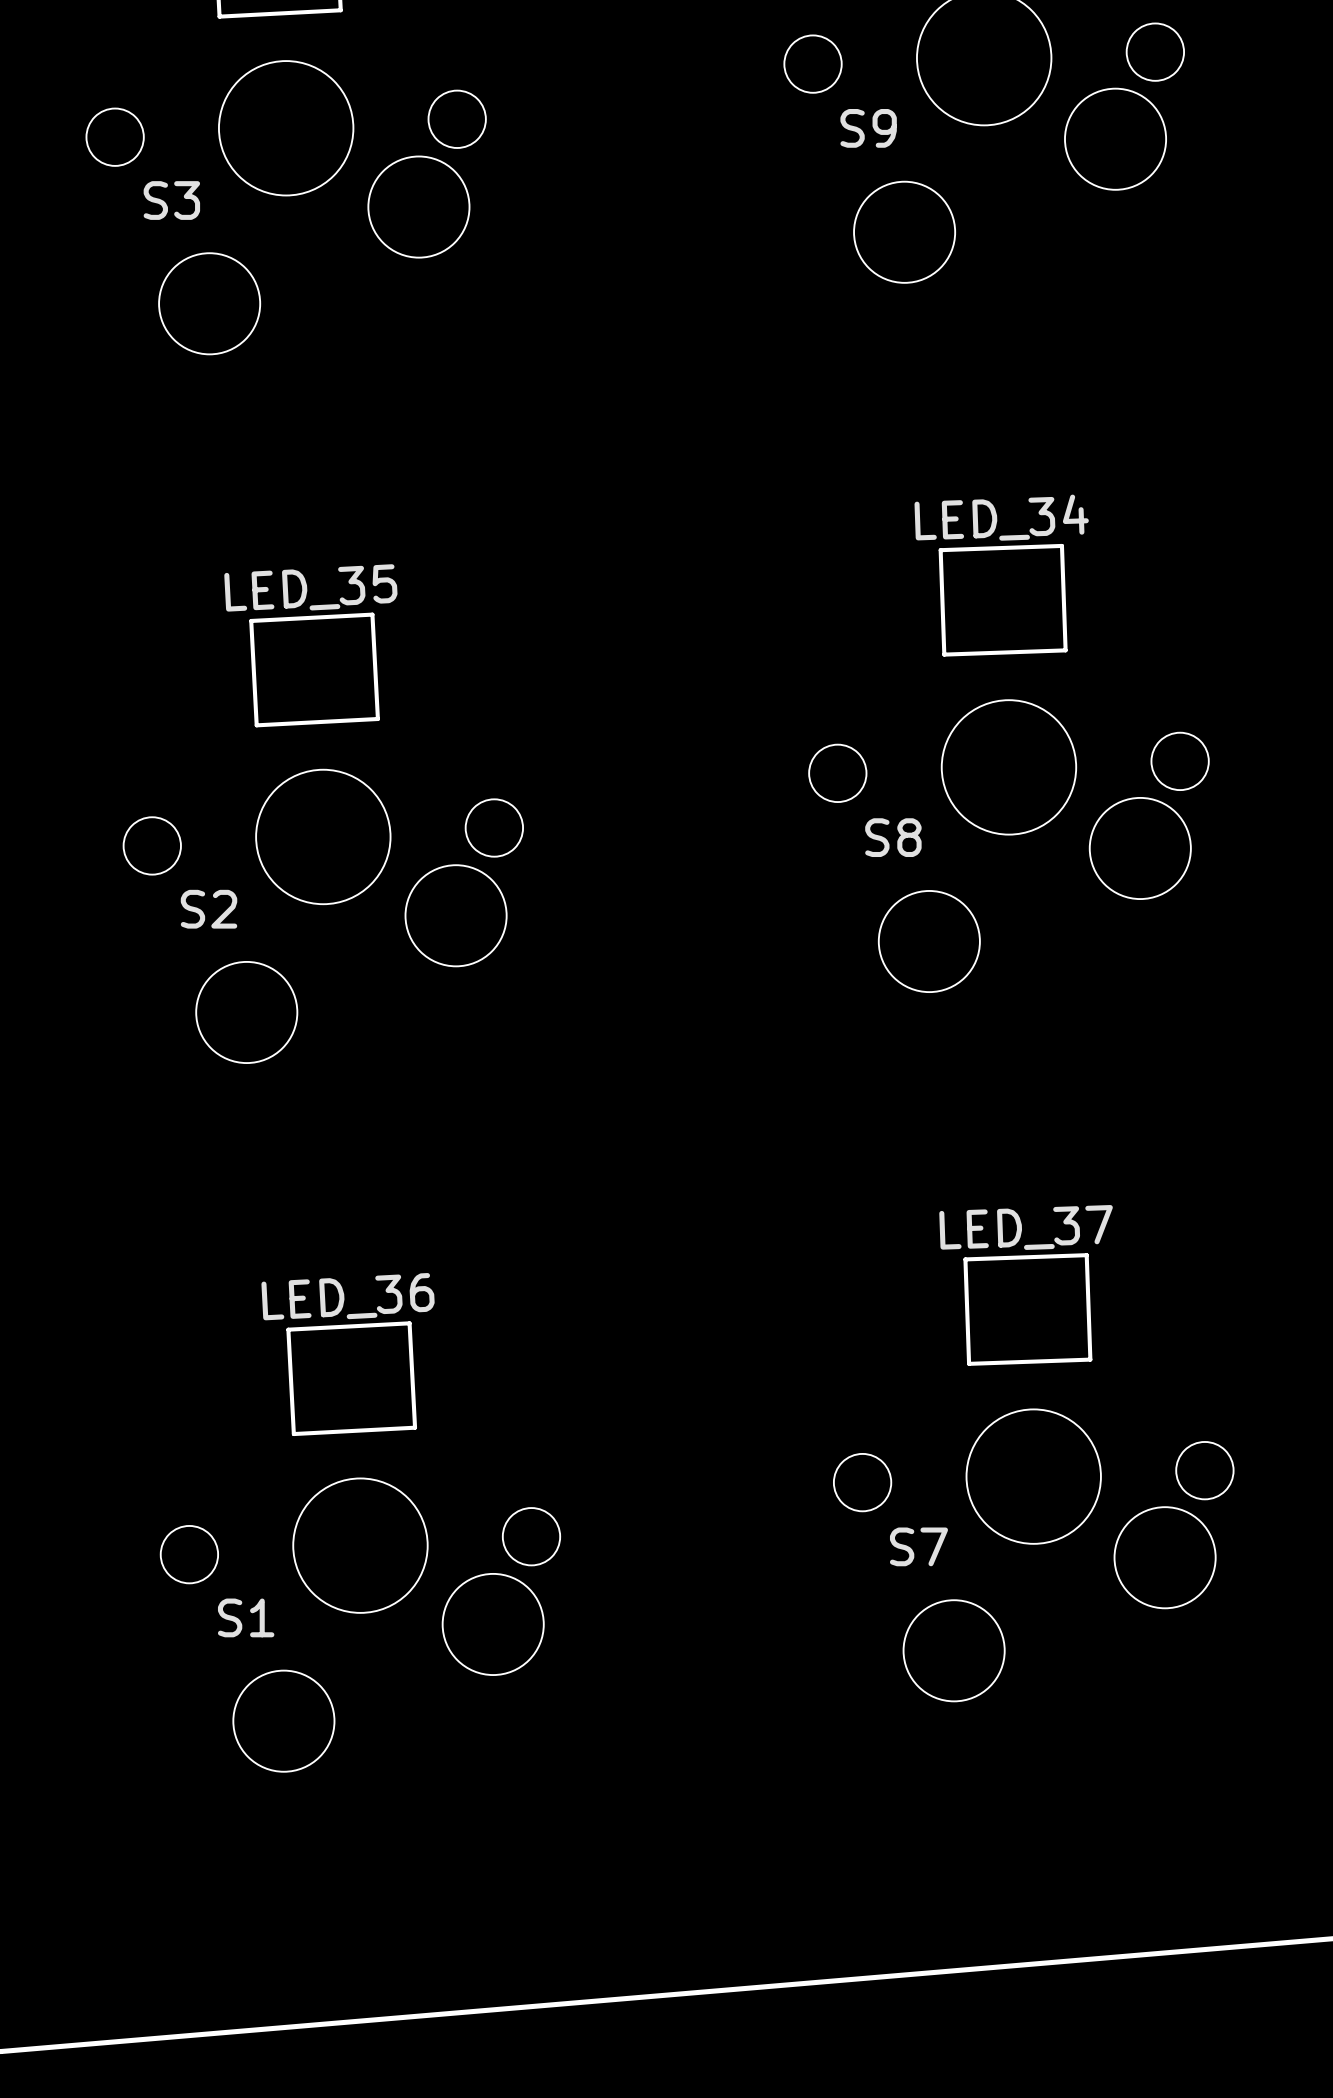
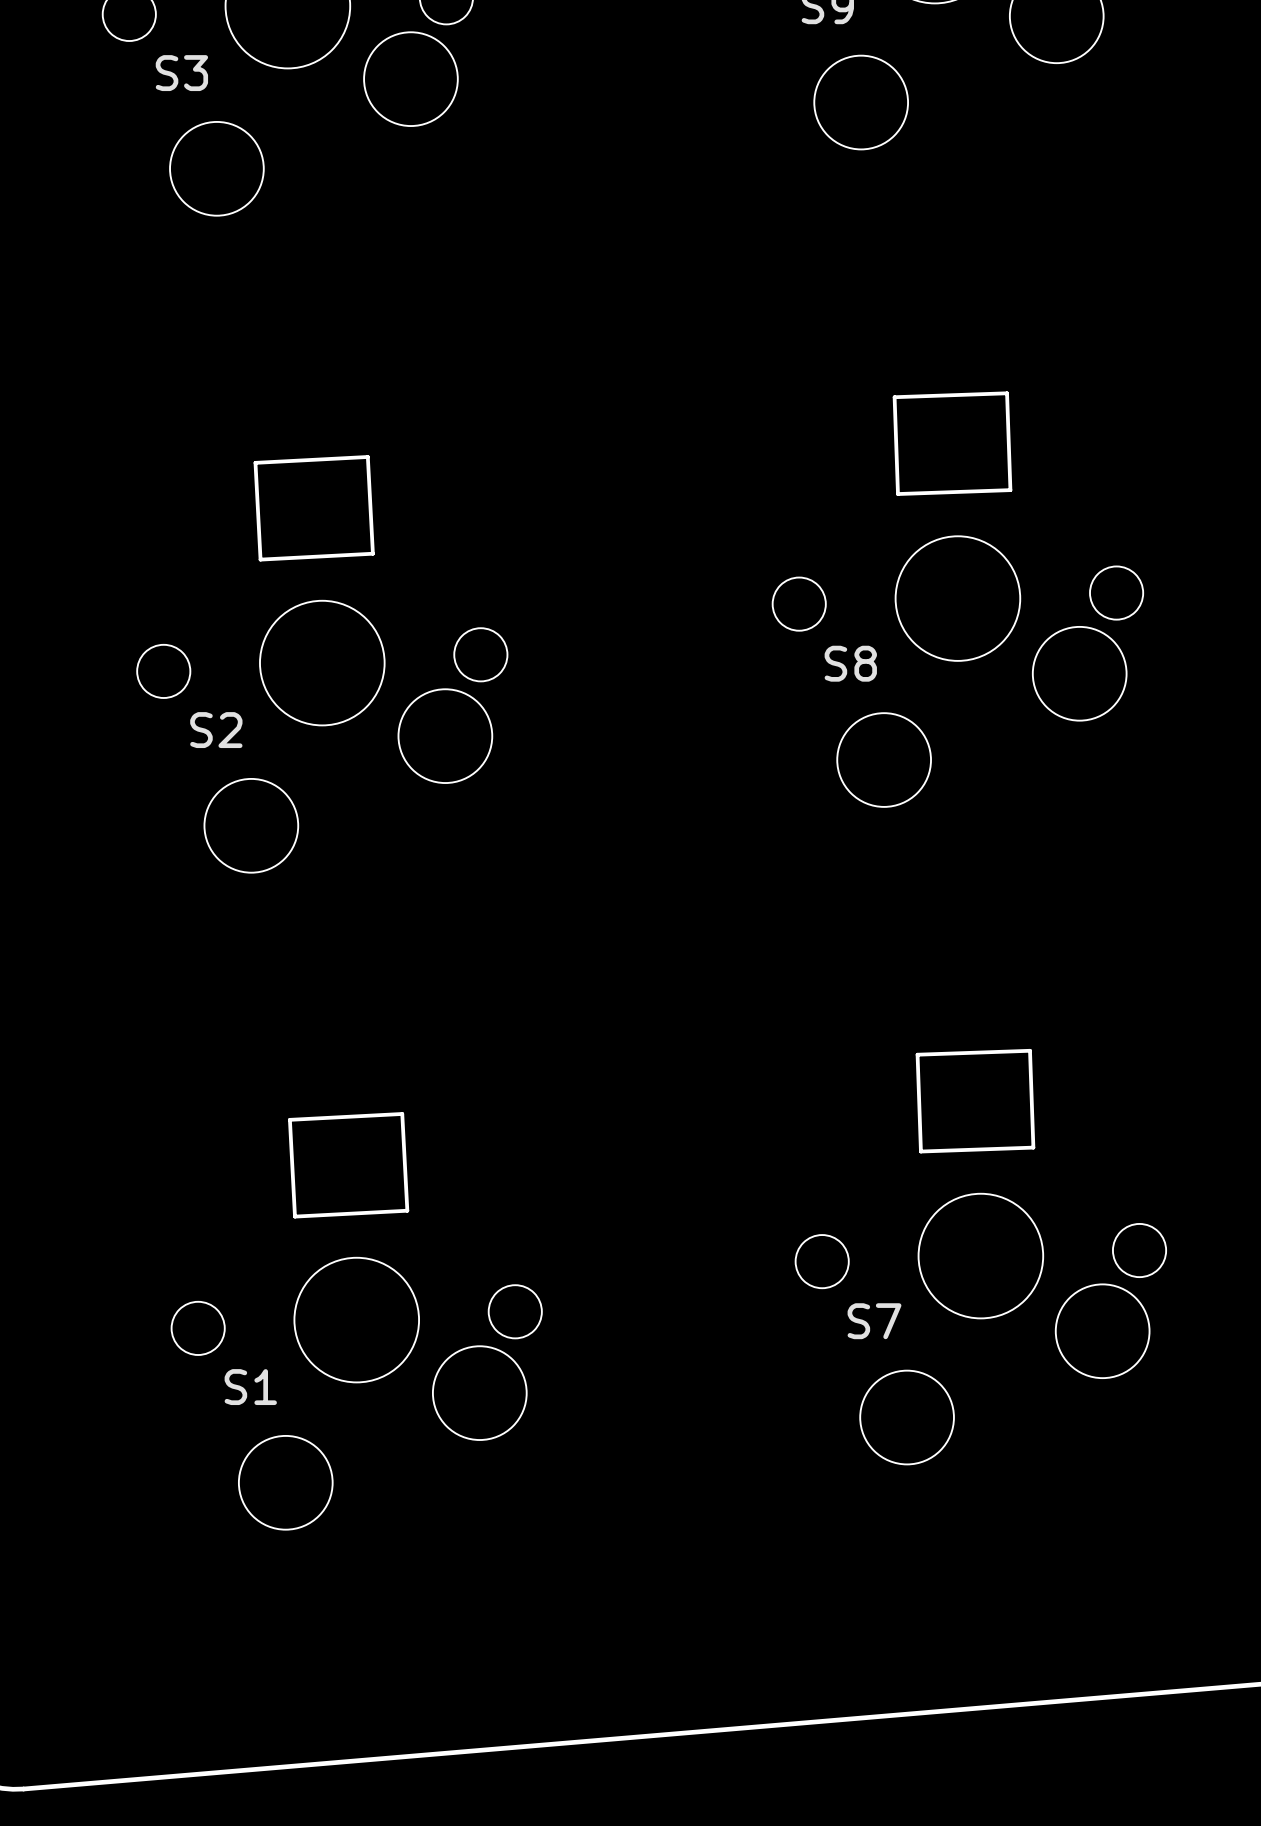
text: LED_34 (1001, 517) -> none
text: LED_35 (310, 587) -> none
text: LED_37 (1026, 1227) -> none
text: LED_36 (348, 1296) -> none

